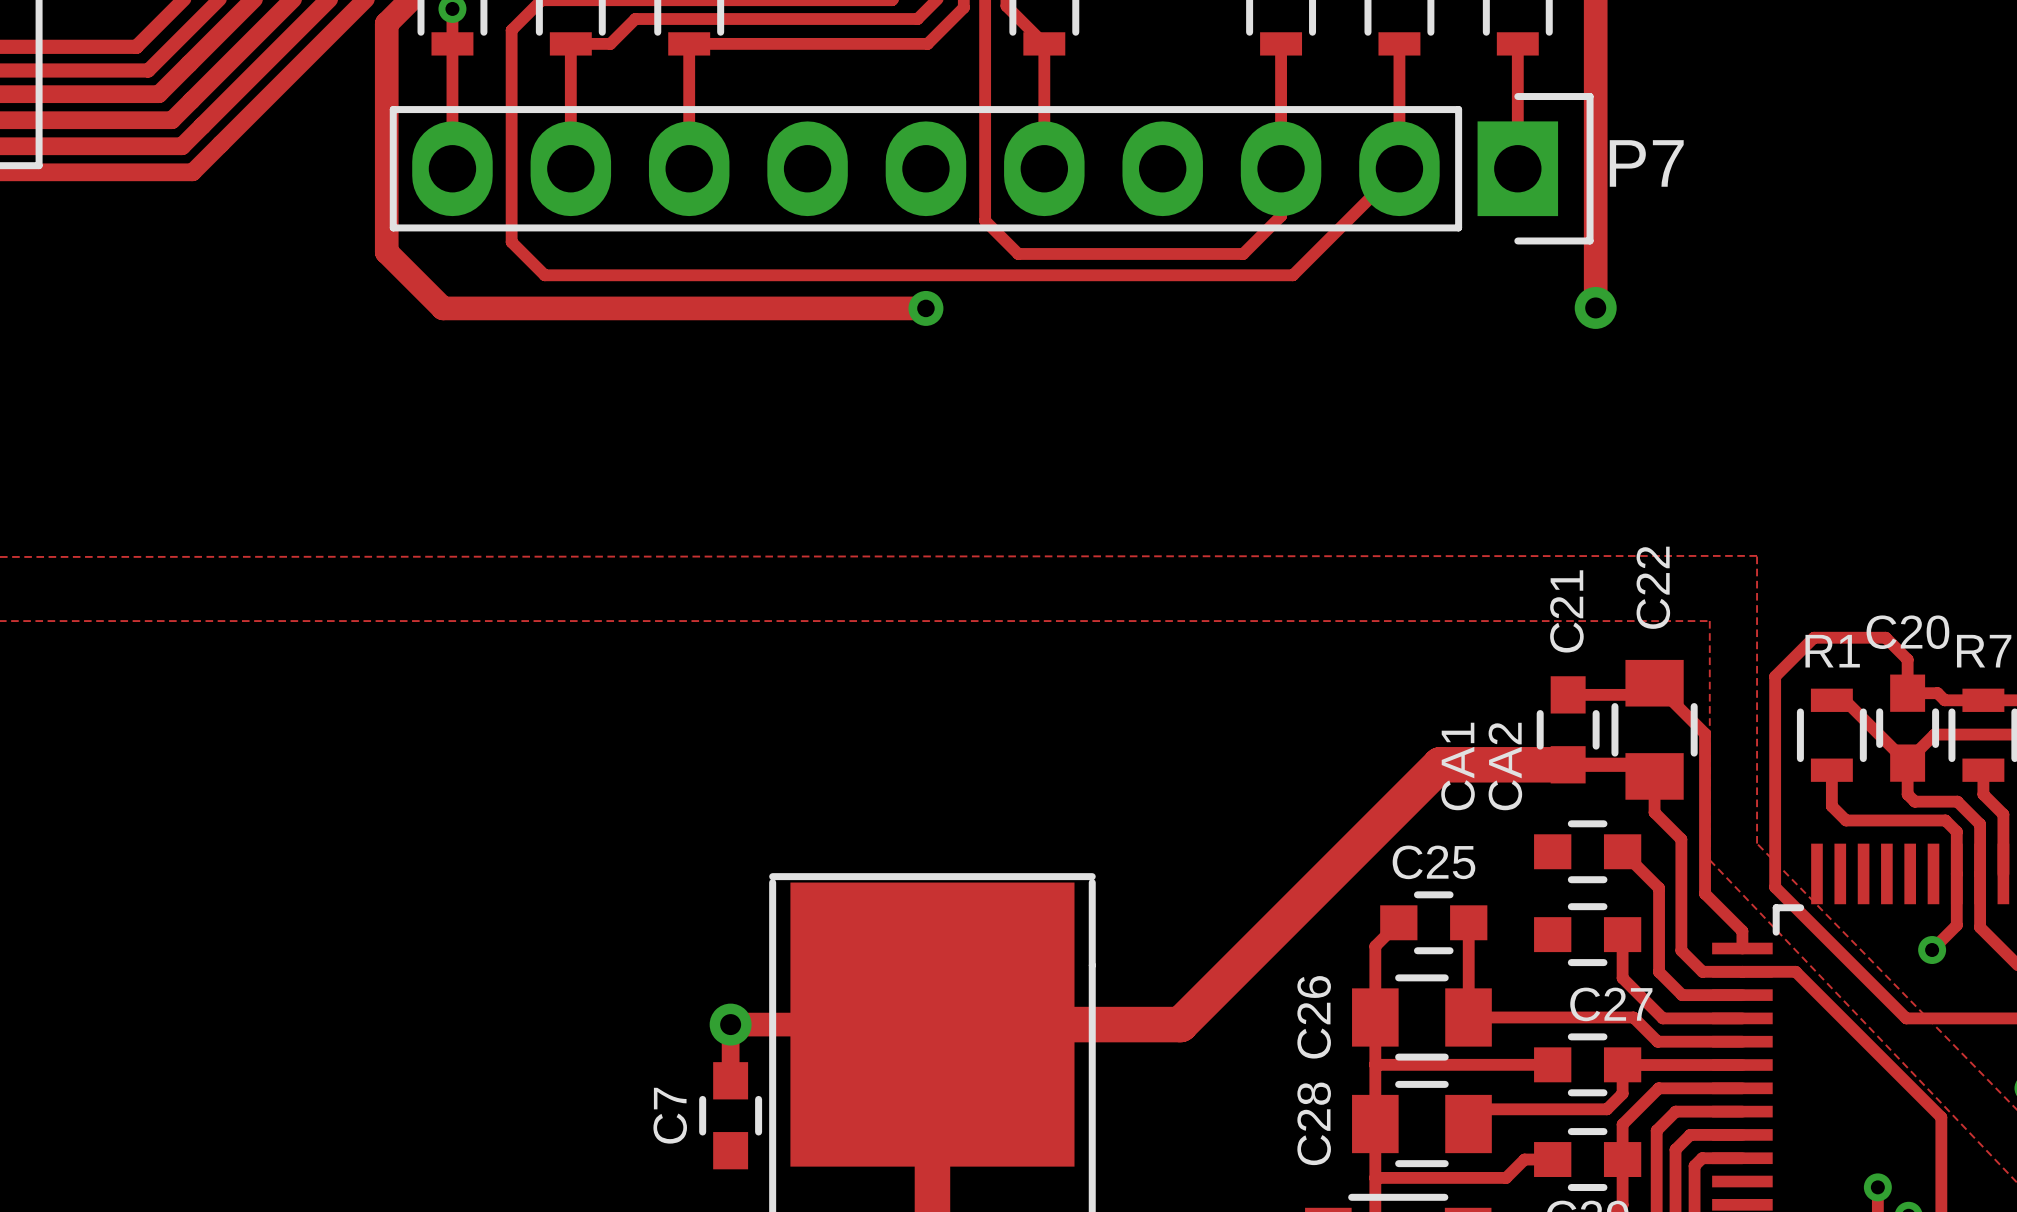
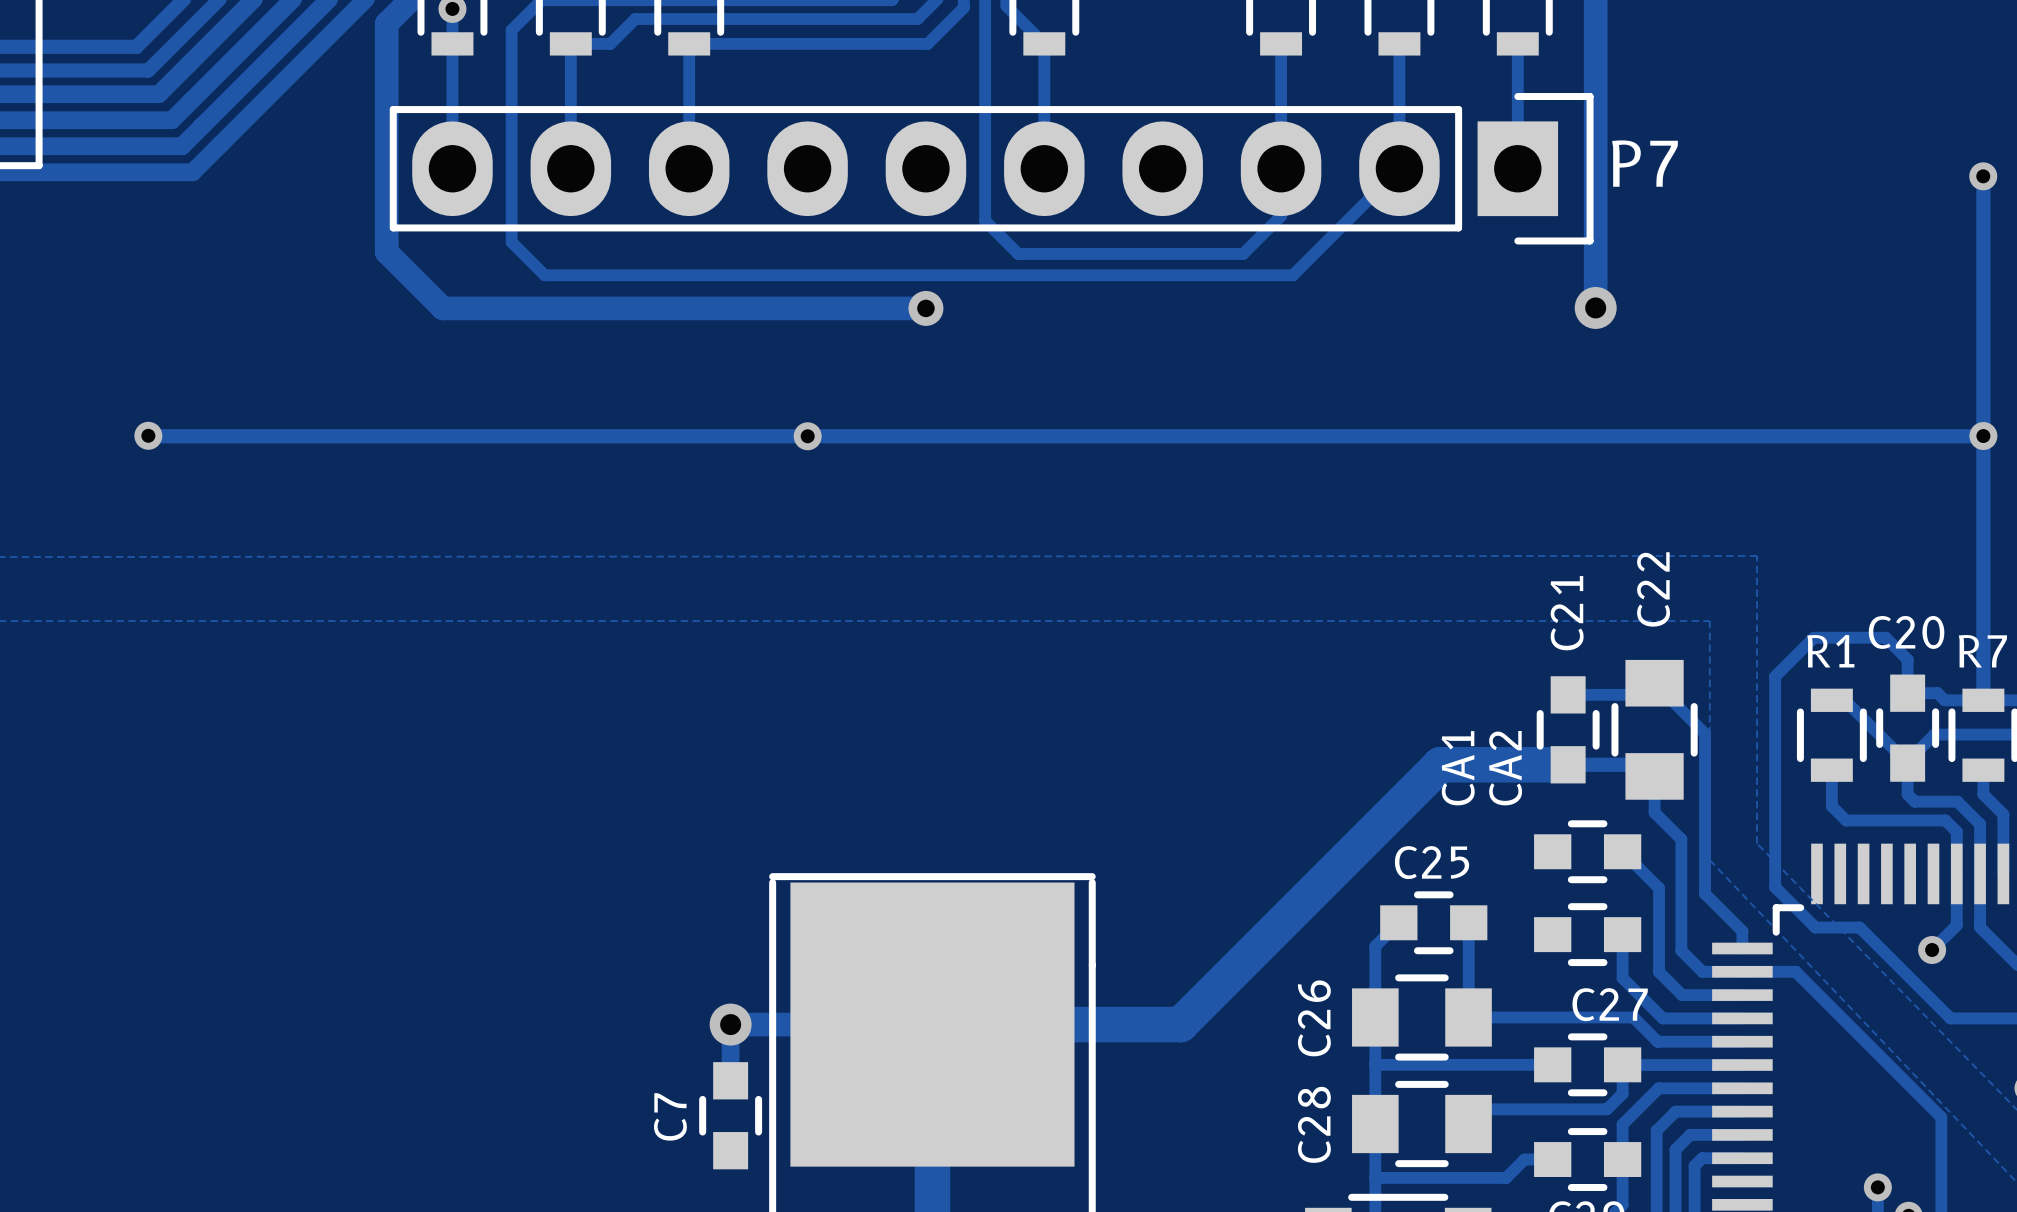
track: none -> (1983, 176) (1983, 700)
via: none -> (1983, 176)
via: none -> (148, 435)
track: none -> (148, 436) (1983, 436)
via: none -> (807, 436)
via: none -> (1983, 436)
track: (1815, 927) (1906, 1018) (1950, 1018) -> (1815, 927) (1859, 927) (1950, 1018)

